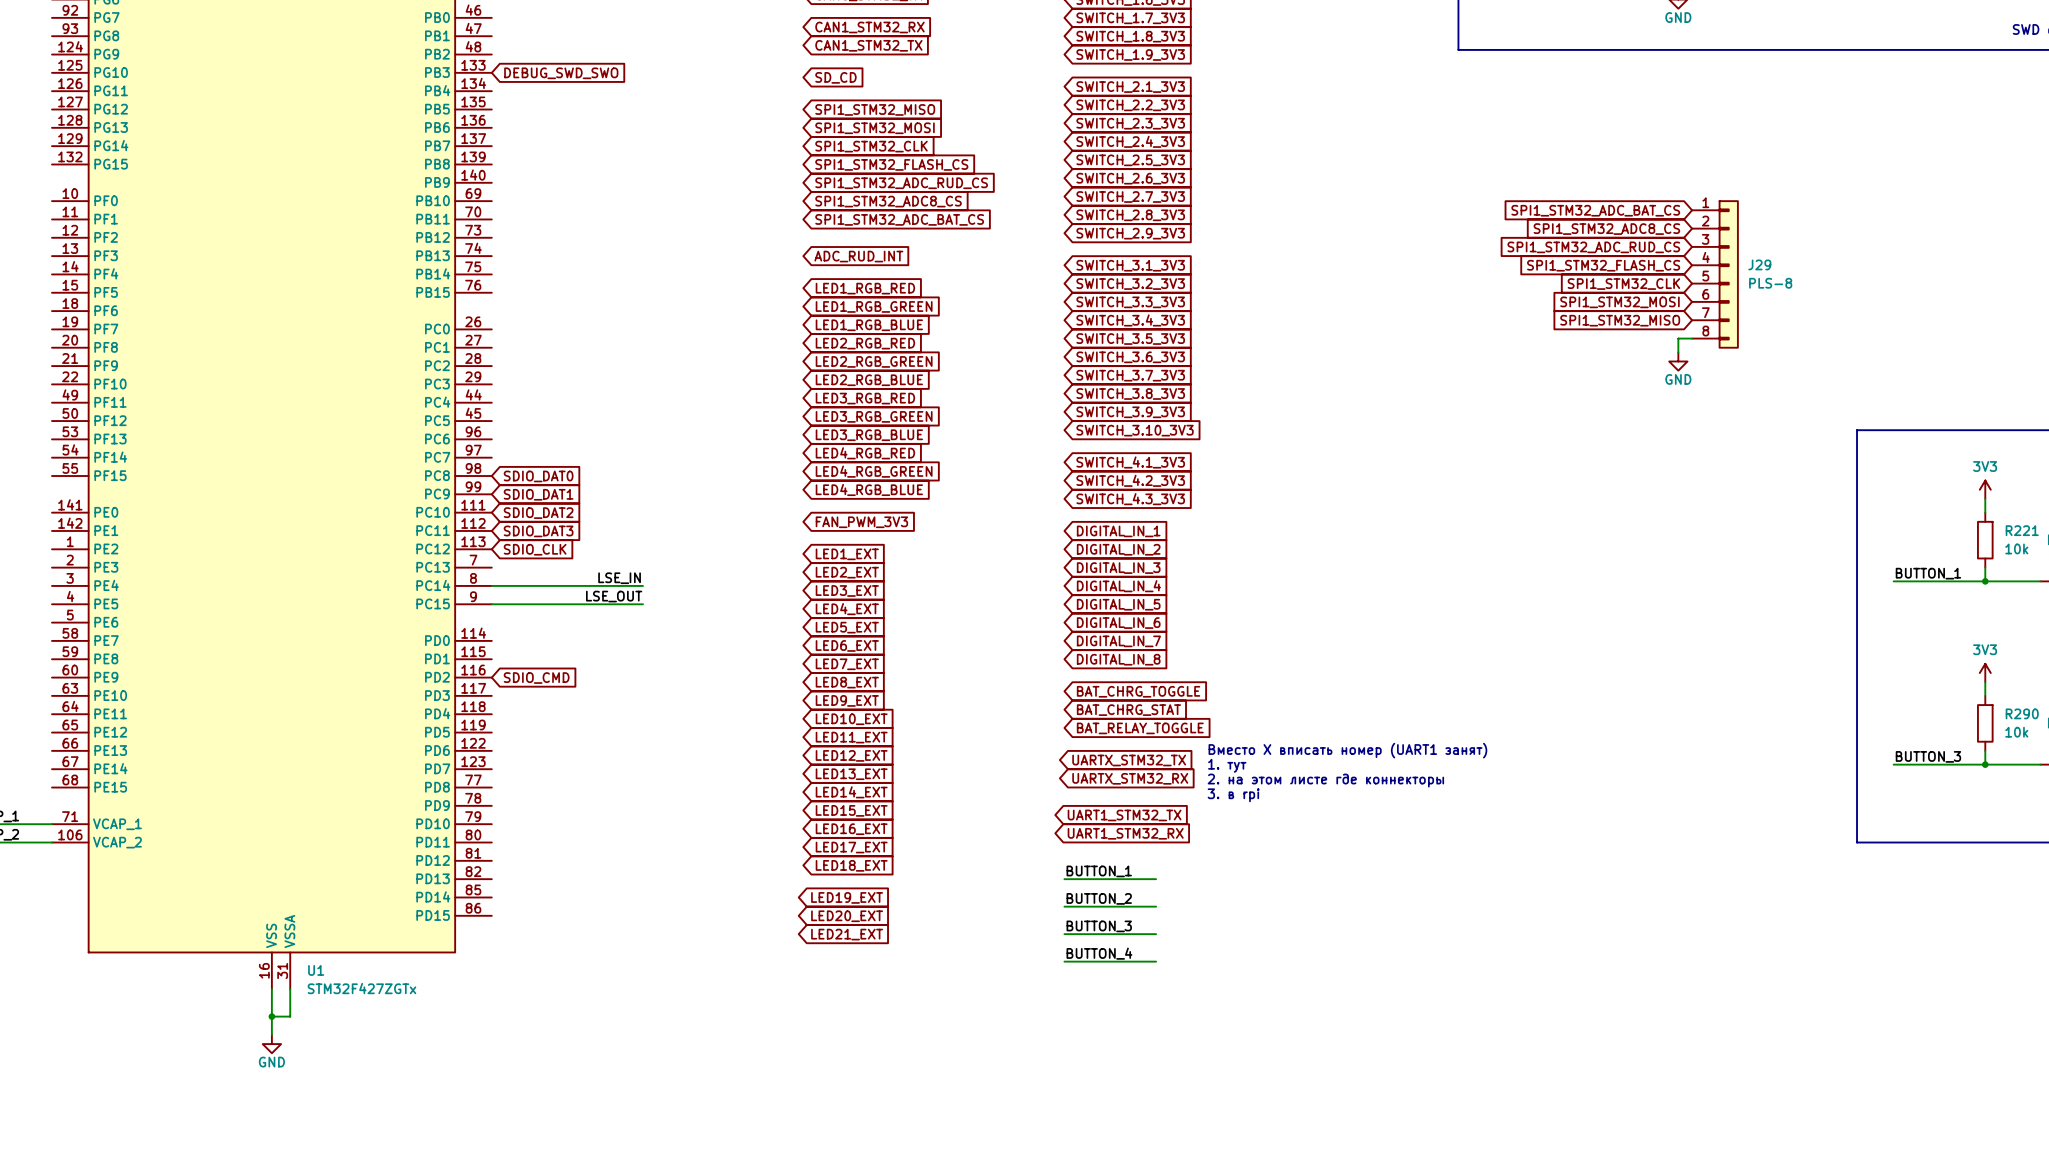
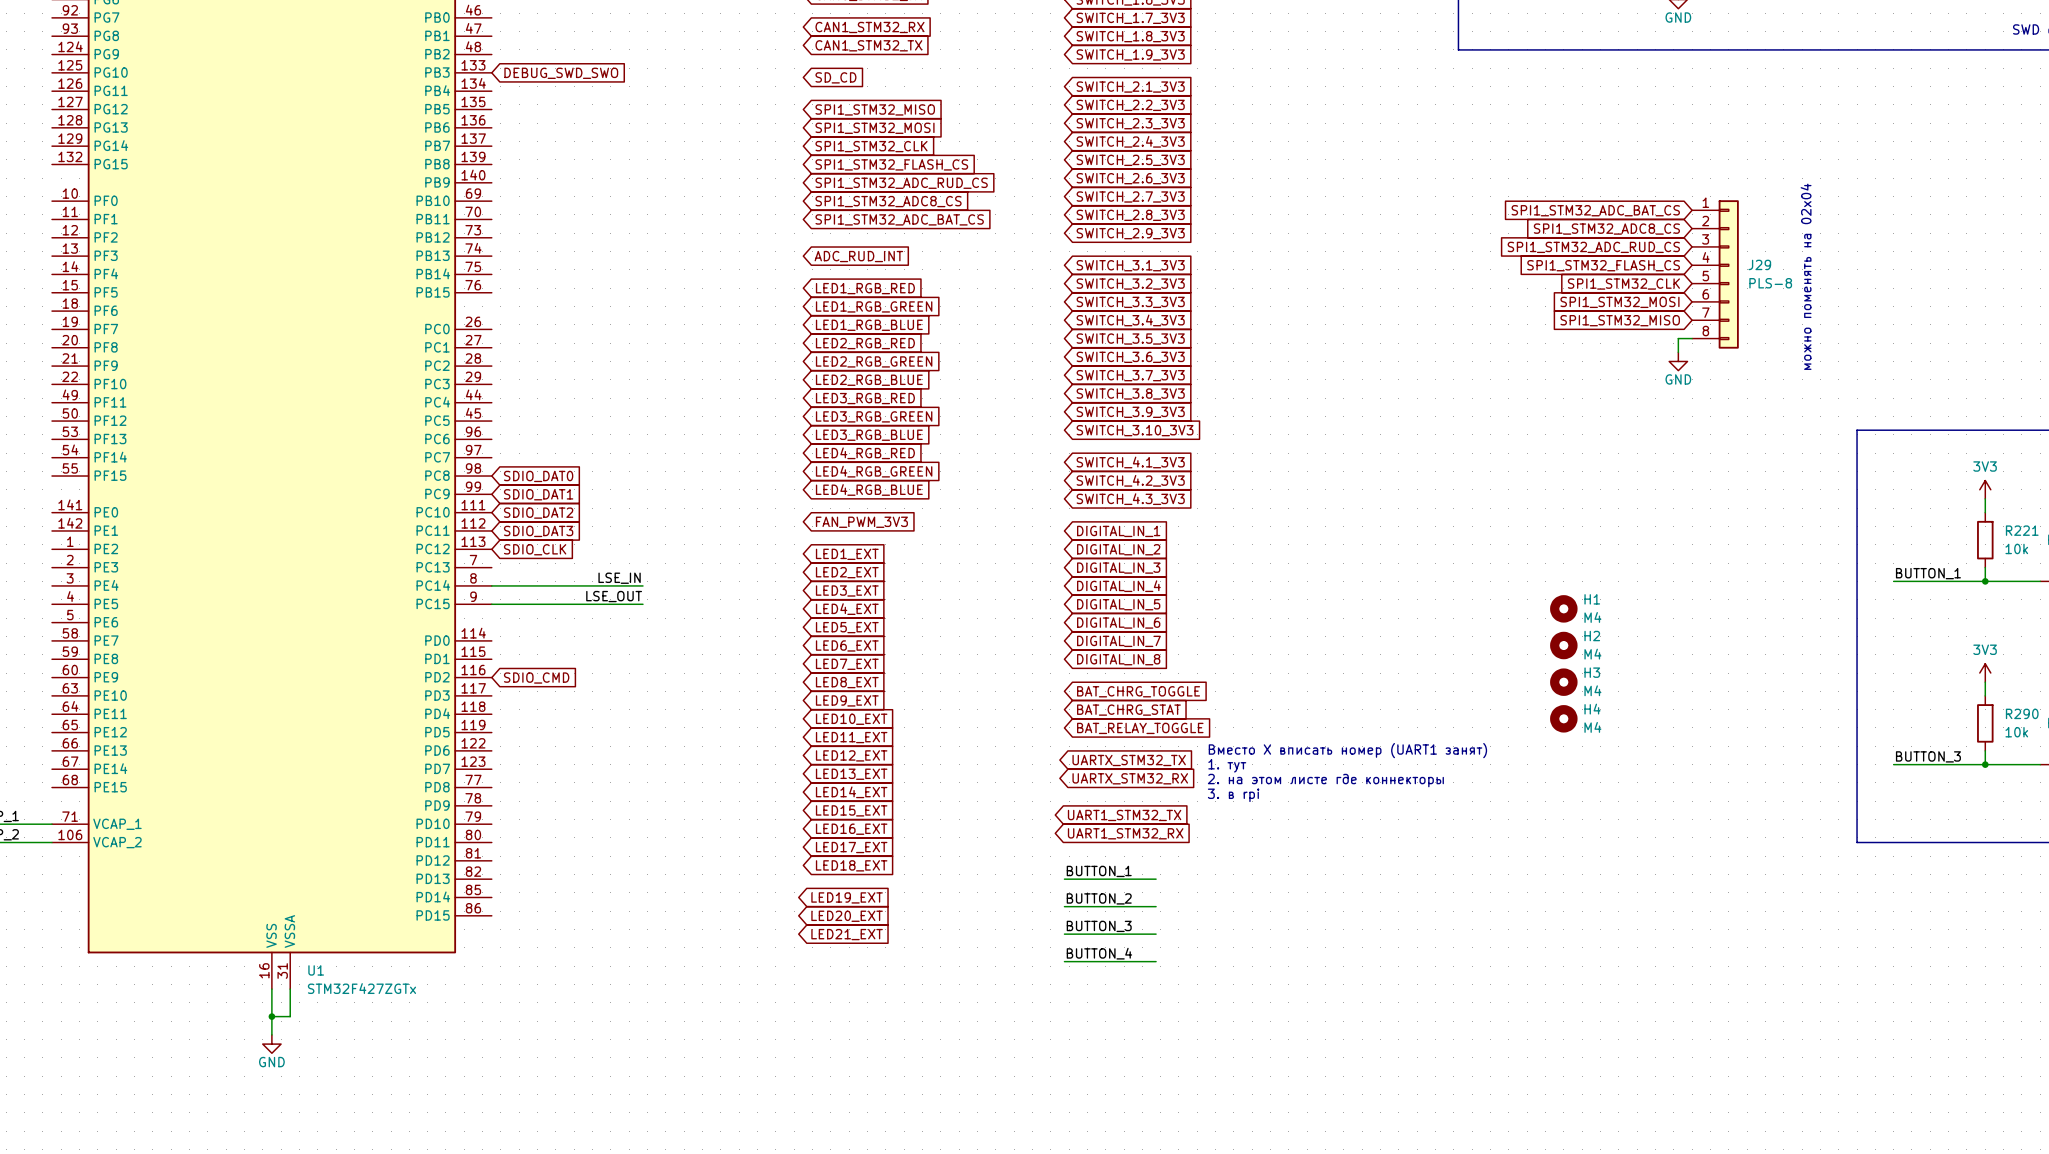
text: none -> можно поменять на 02х04 (1806, 276)
H1: none -> M4 (1563, 608)
H2: none -> M4 (1563, 645)
H3: none -> M4 (1563, 682)
H4: none -> M4 (1563, 718)

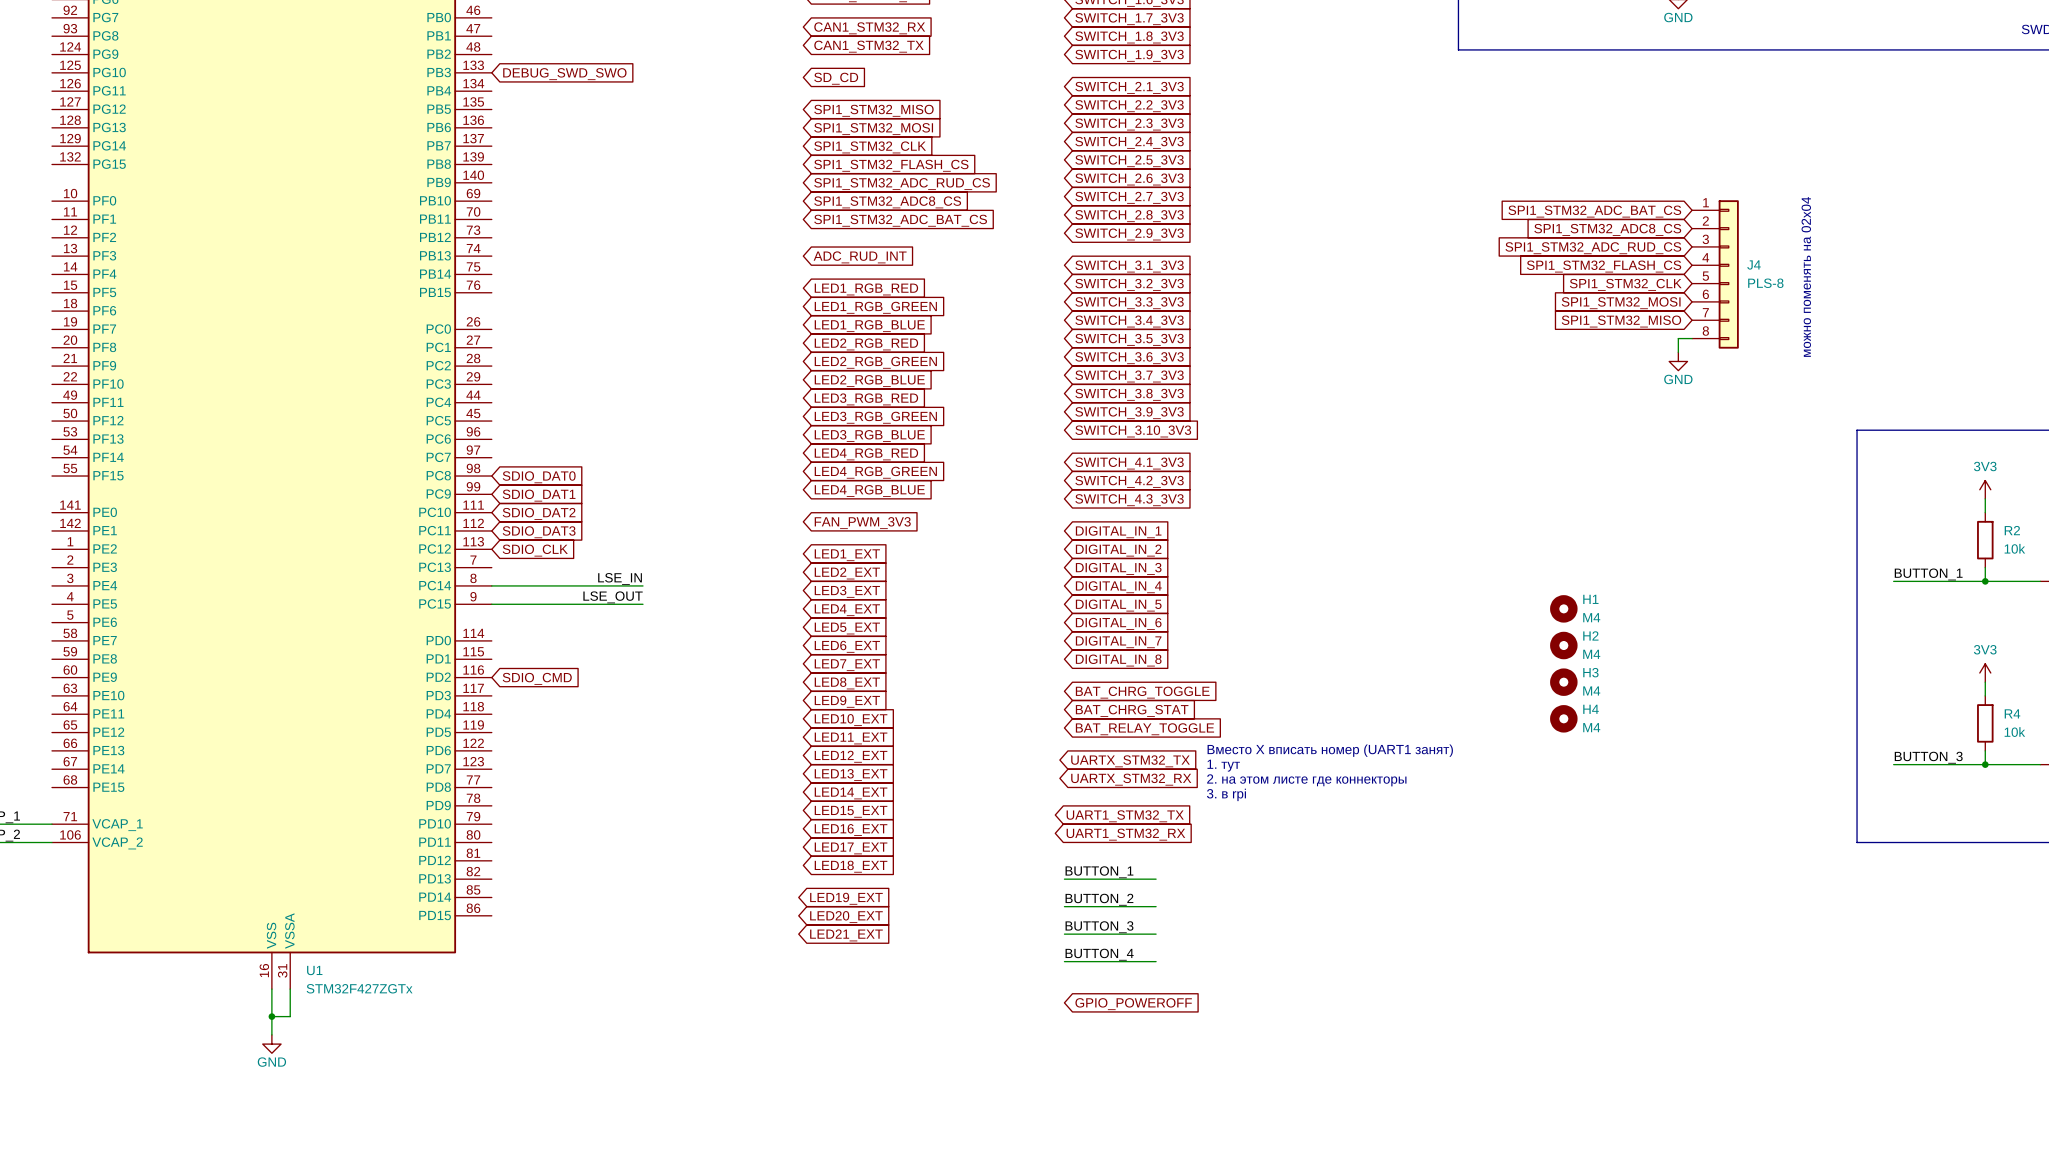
J29 name: J29 (1759, 264) -> J4 (1754, 264)
R221 name: R221 (2022, 530) -> R2 (2012, 530)
R290 name: R290 (2022, 713) -> R4 (2012, 713)
global label: none -> GPIO_POWEROFF (1133, 1004)

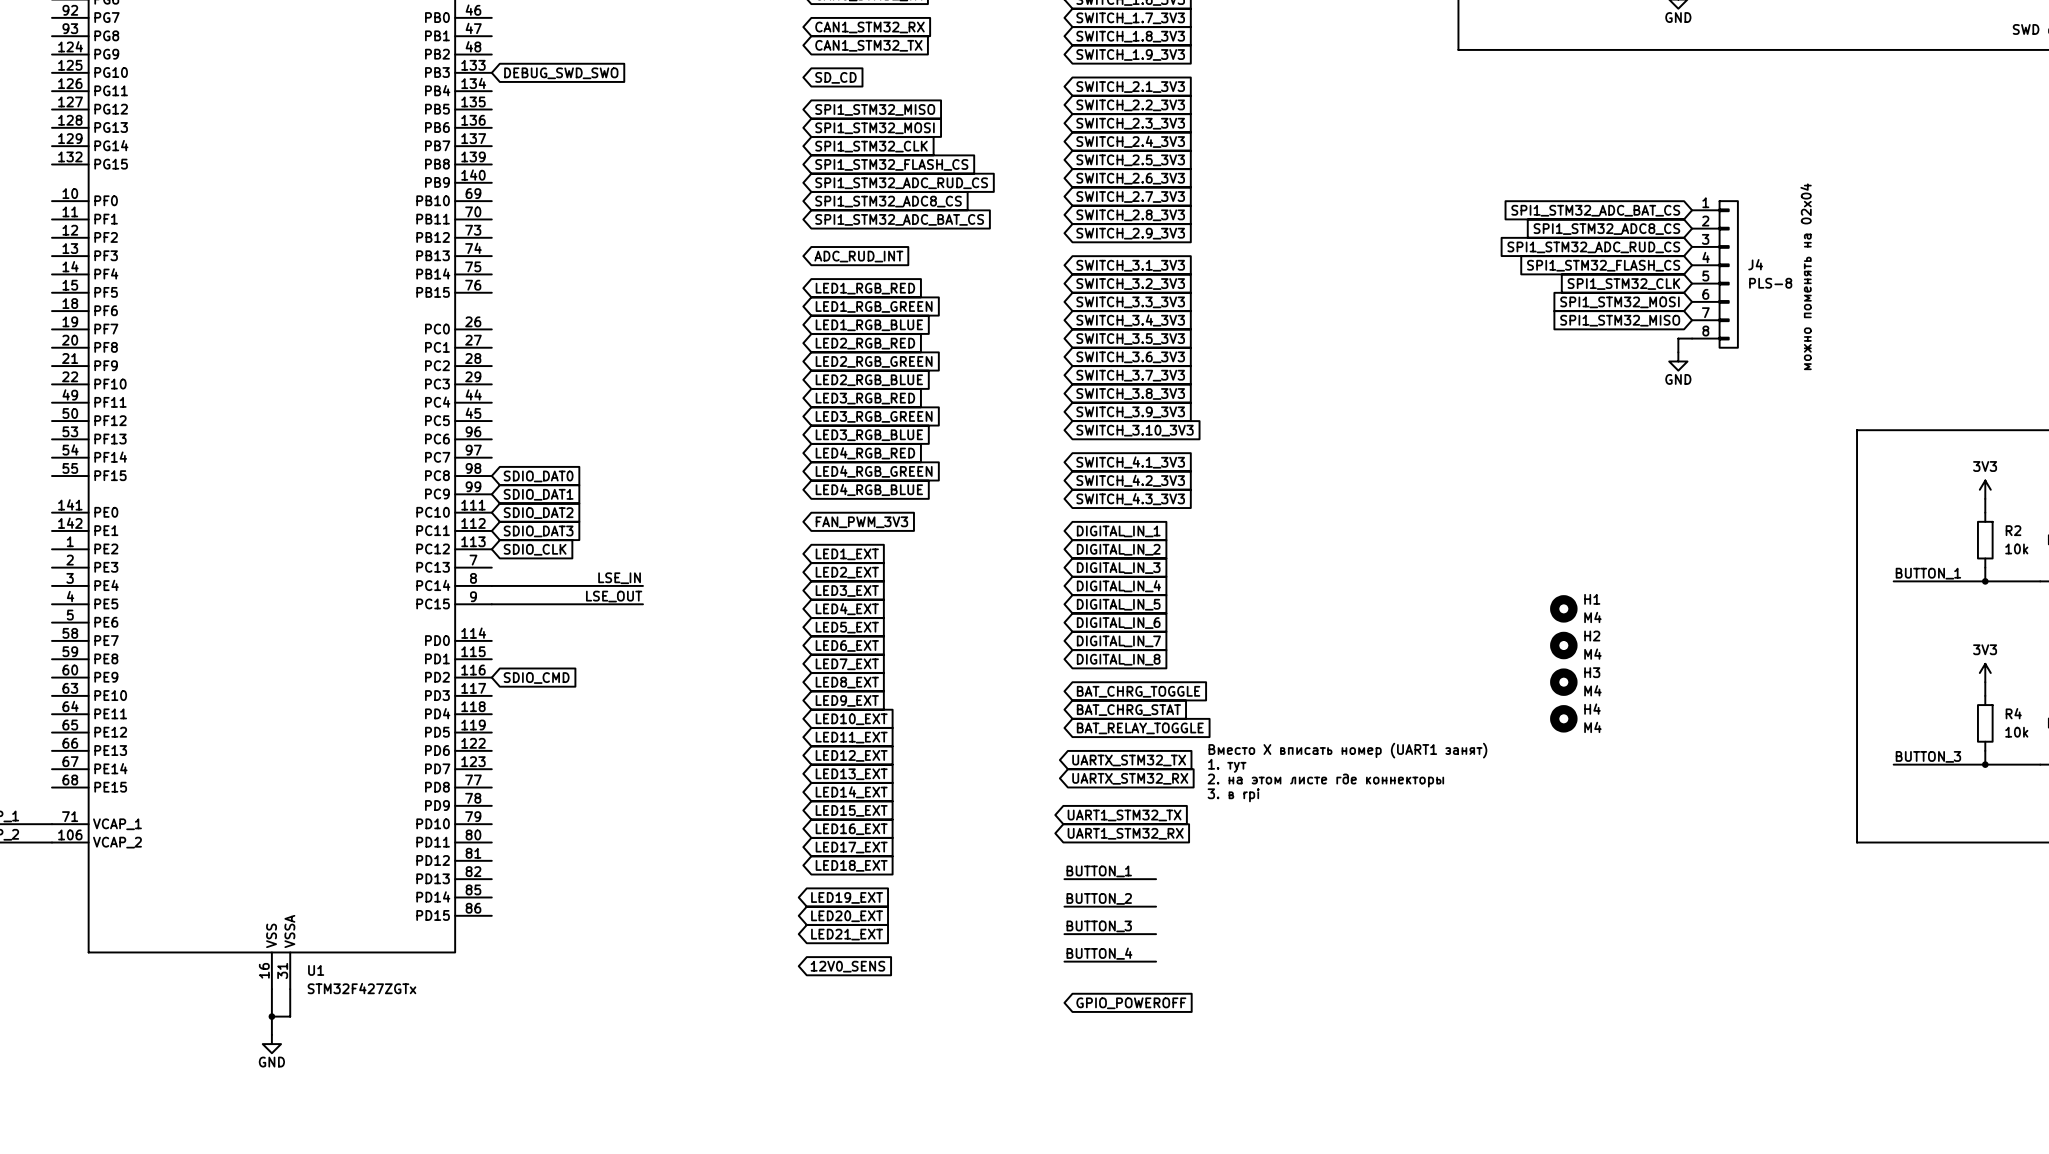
global label: none -> 12V0_SENS (847, 966)

